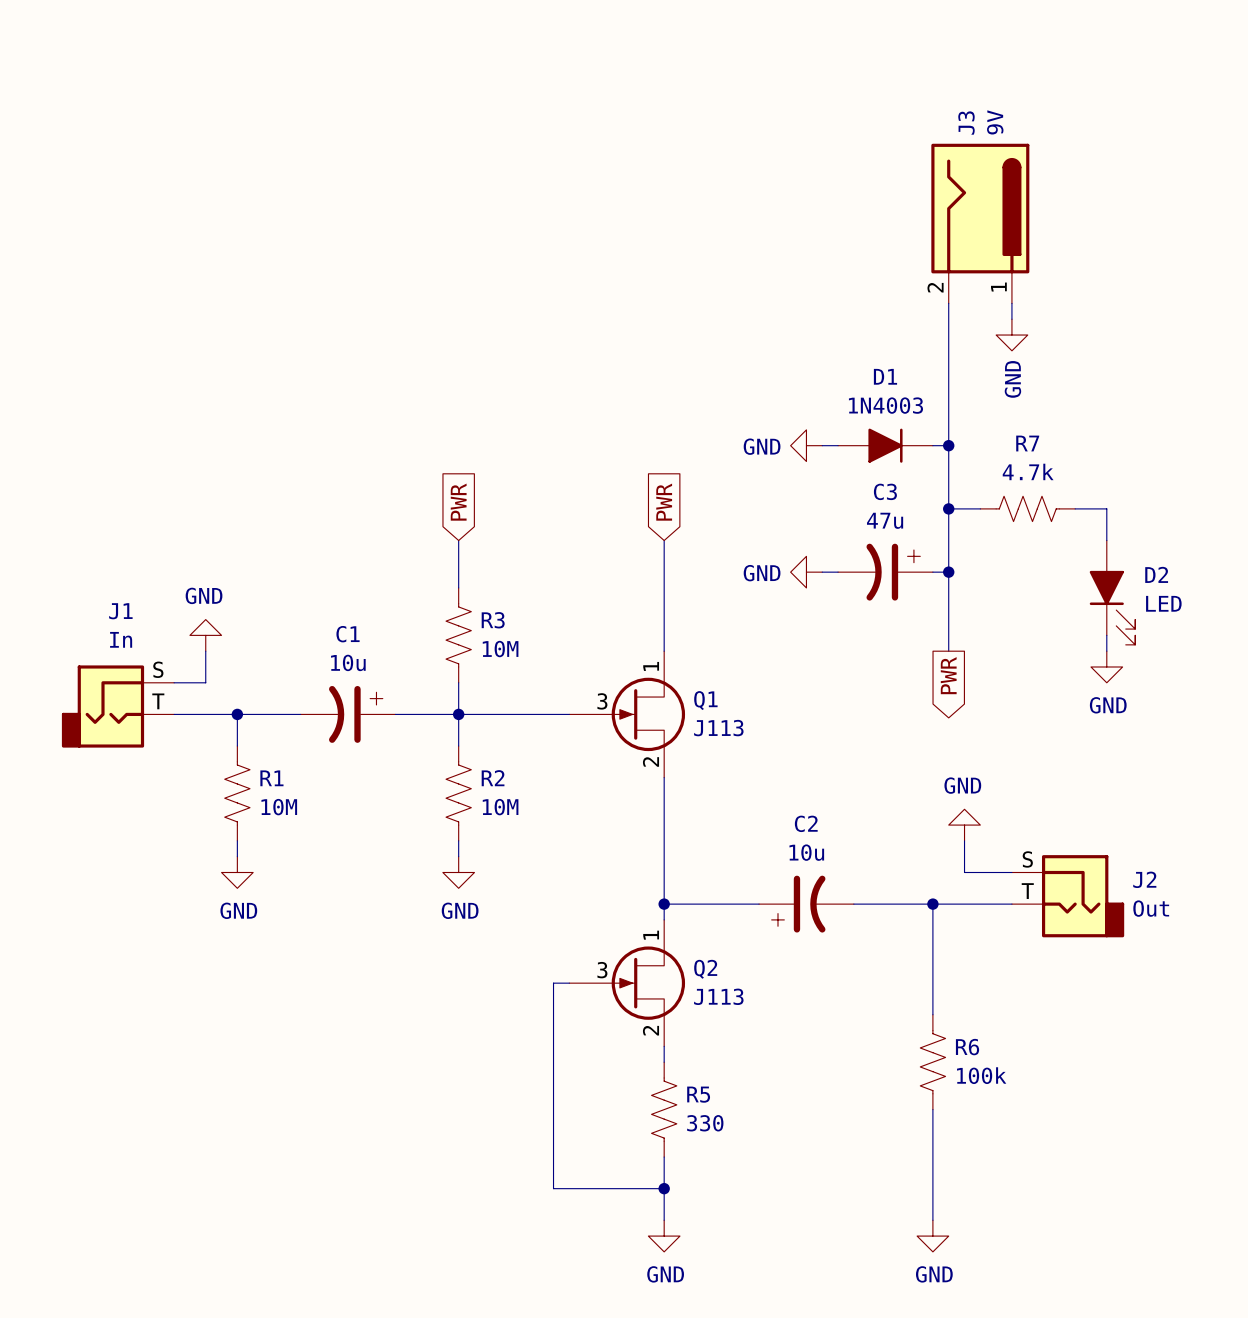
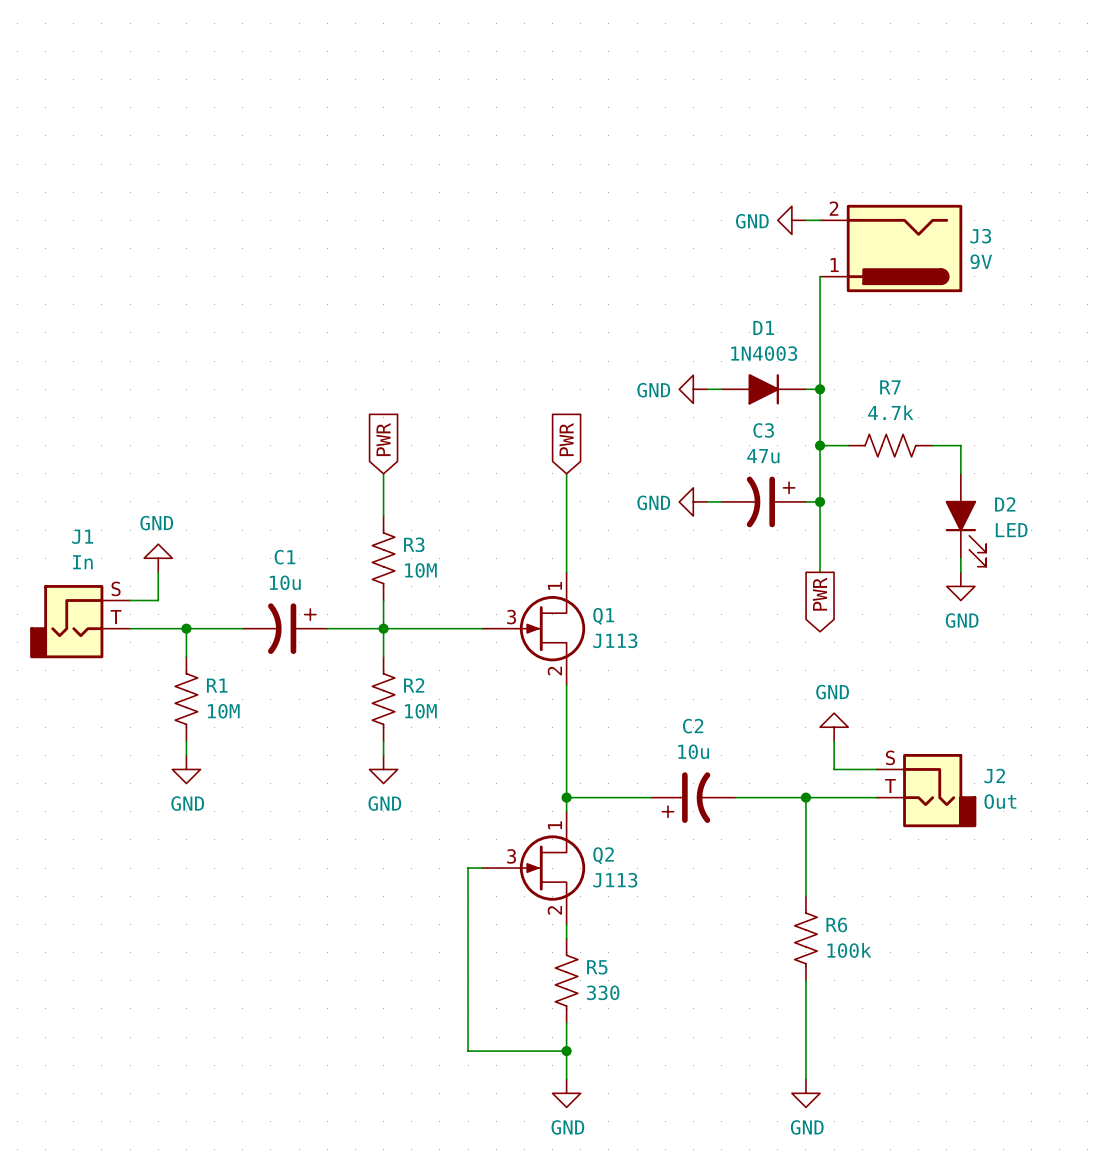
J3 rotation: 0° (980, 208) -> 90° clockwise (904, 248)
wire: (948, 303) (948, 319) -> none
power symbol rotation: 0° (1011, 335) -> 90° clockwise (791, 220)
power symbol position: GND (1011, 335) -> GND (791, 220)

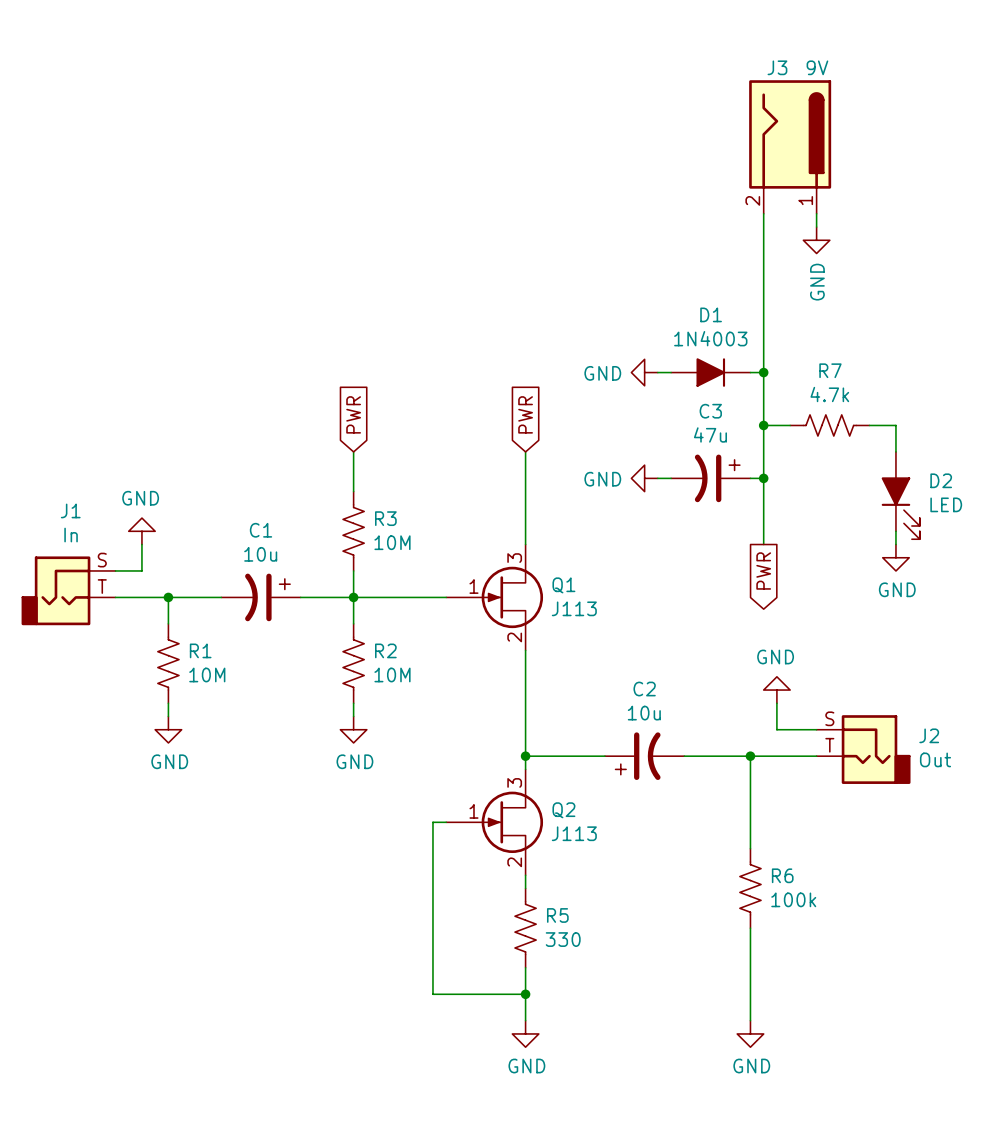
power symbol rotation: 0° (791, 220) -> 90° counterclockwise (816, 240)
power symbol position: GND (791, 220) -> GND (816, 240)
wire: (805, 220) (820, 220) -> (763, 266) (763, 213)
J3 position: (891, 248) -> (790, 147)
J3 rotation: 0° (904, 248) -> 90° counterclockwise (790, 134)
Q1 pin number: 1 (554, 585) -> 3 (514, 558)
Q1 pin number: 3 (511, 617) -> 1 (473, 586)
Q2 pin number: 1 (554, 825) -> 3 (514, 782)
Q2 pin number: 3 (511, 856) -> 1 (473, 811)

